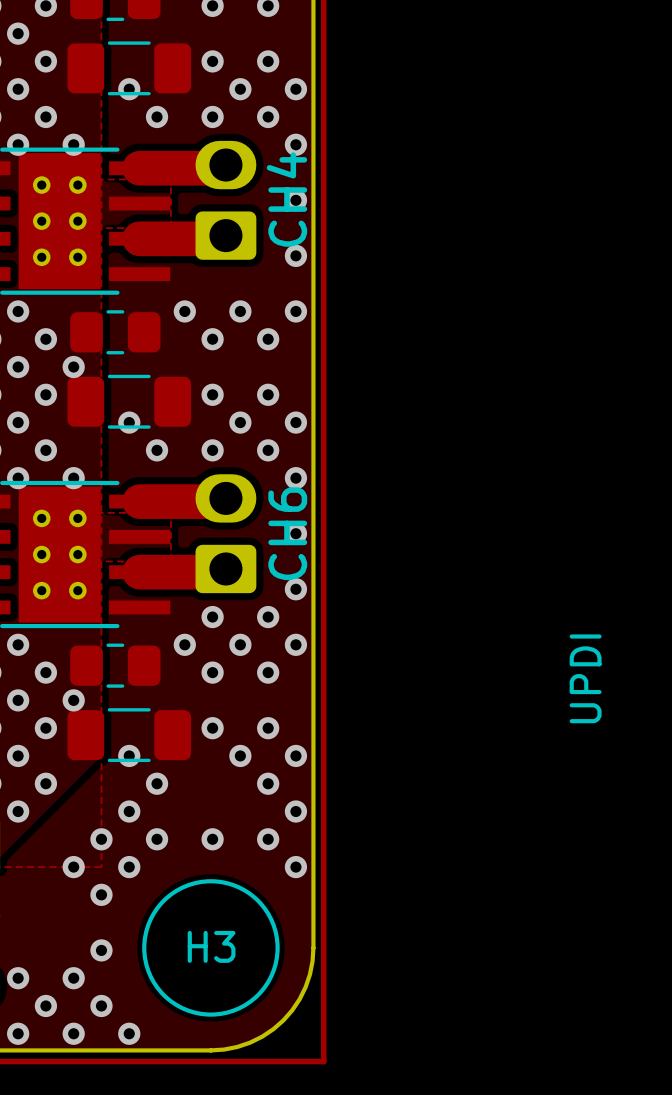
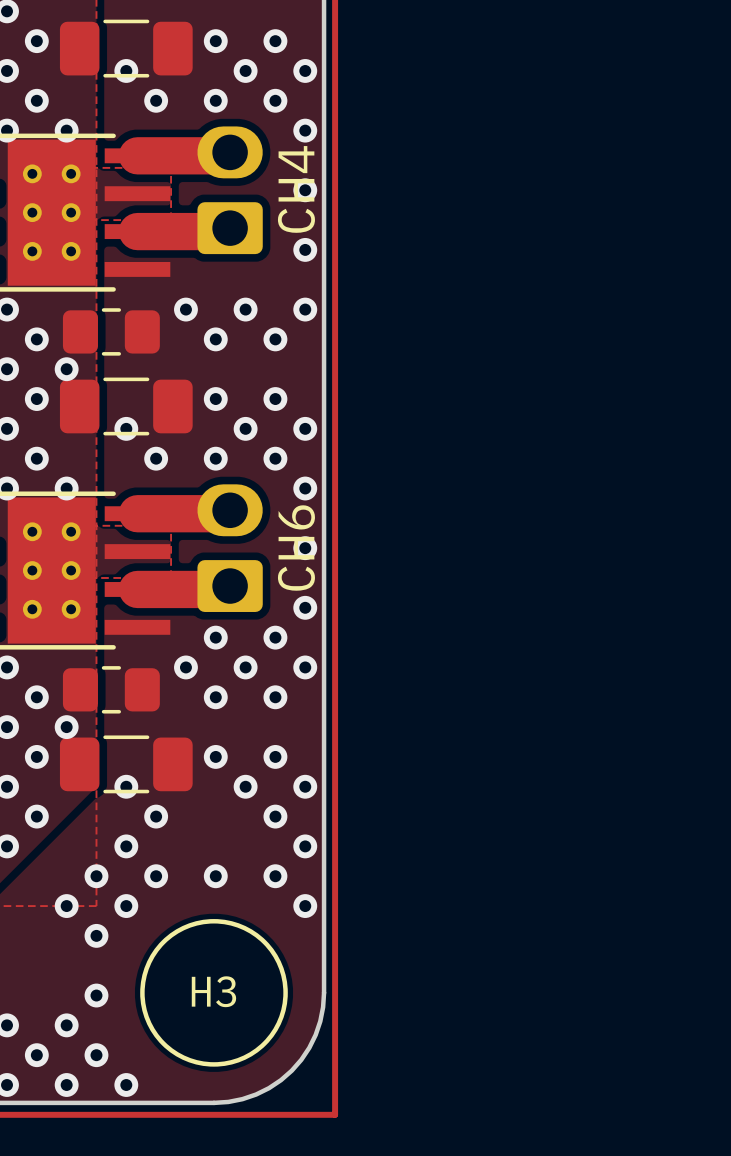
text: UPDI (585, 678) -> none

